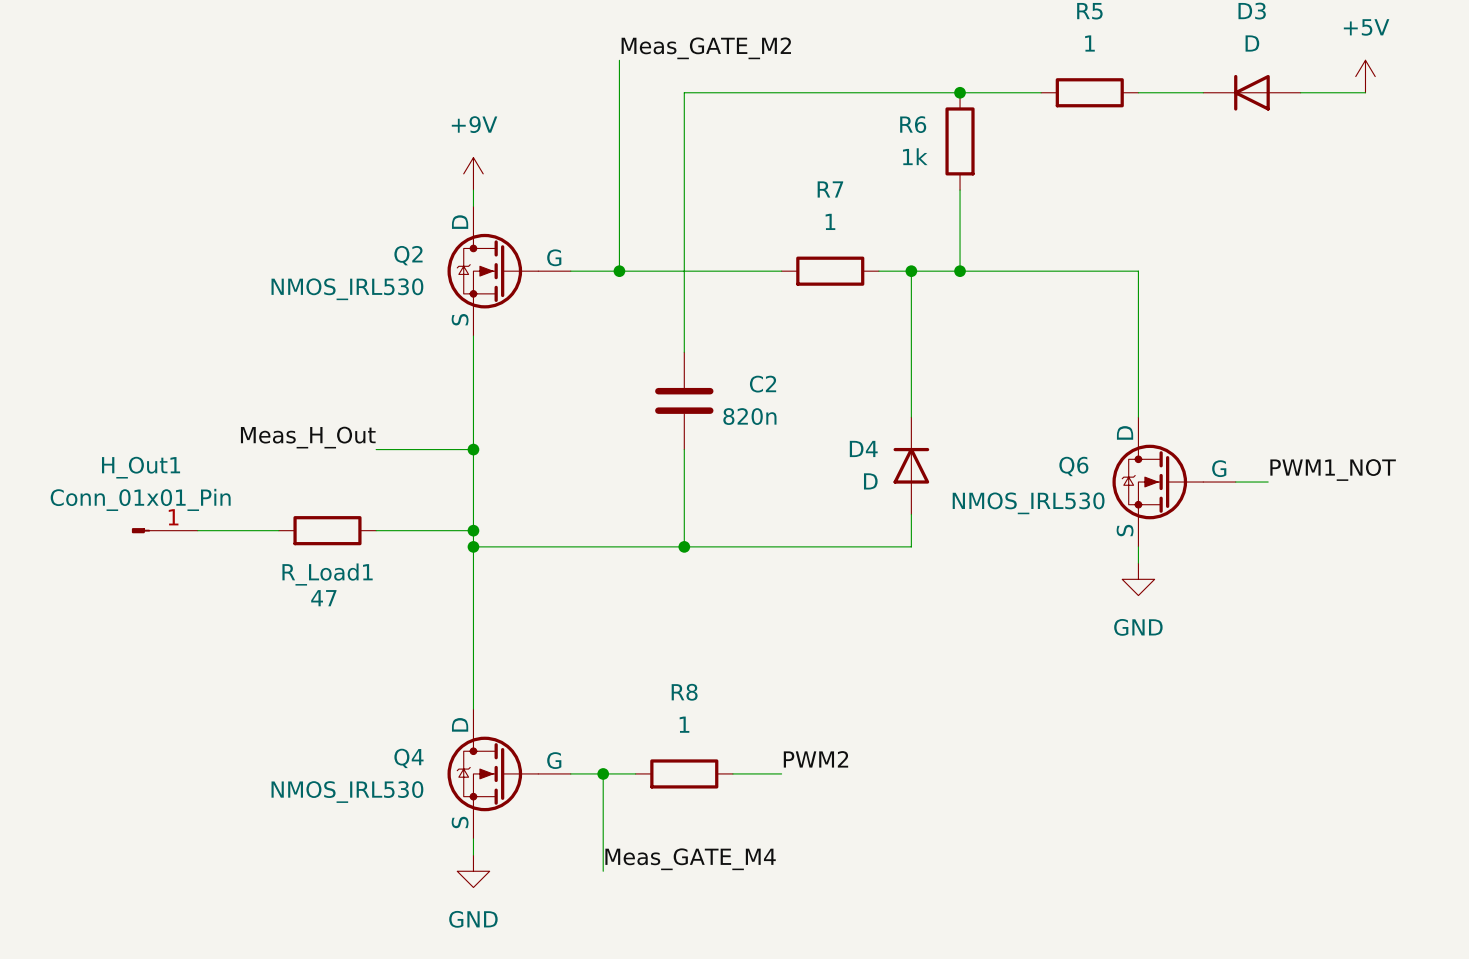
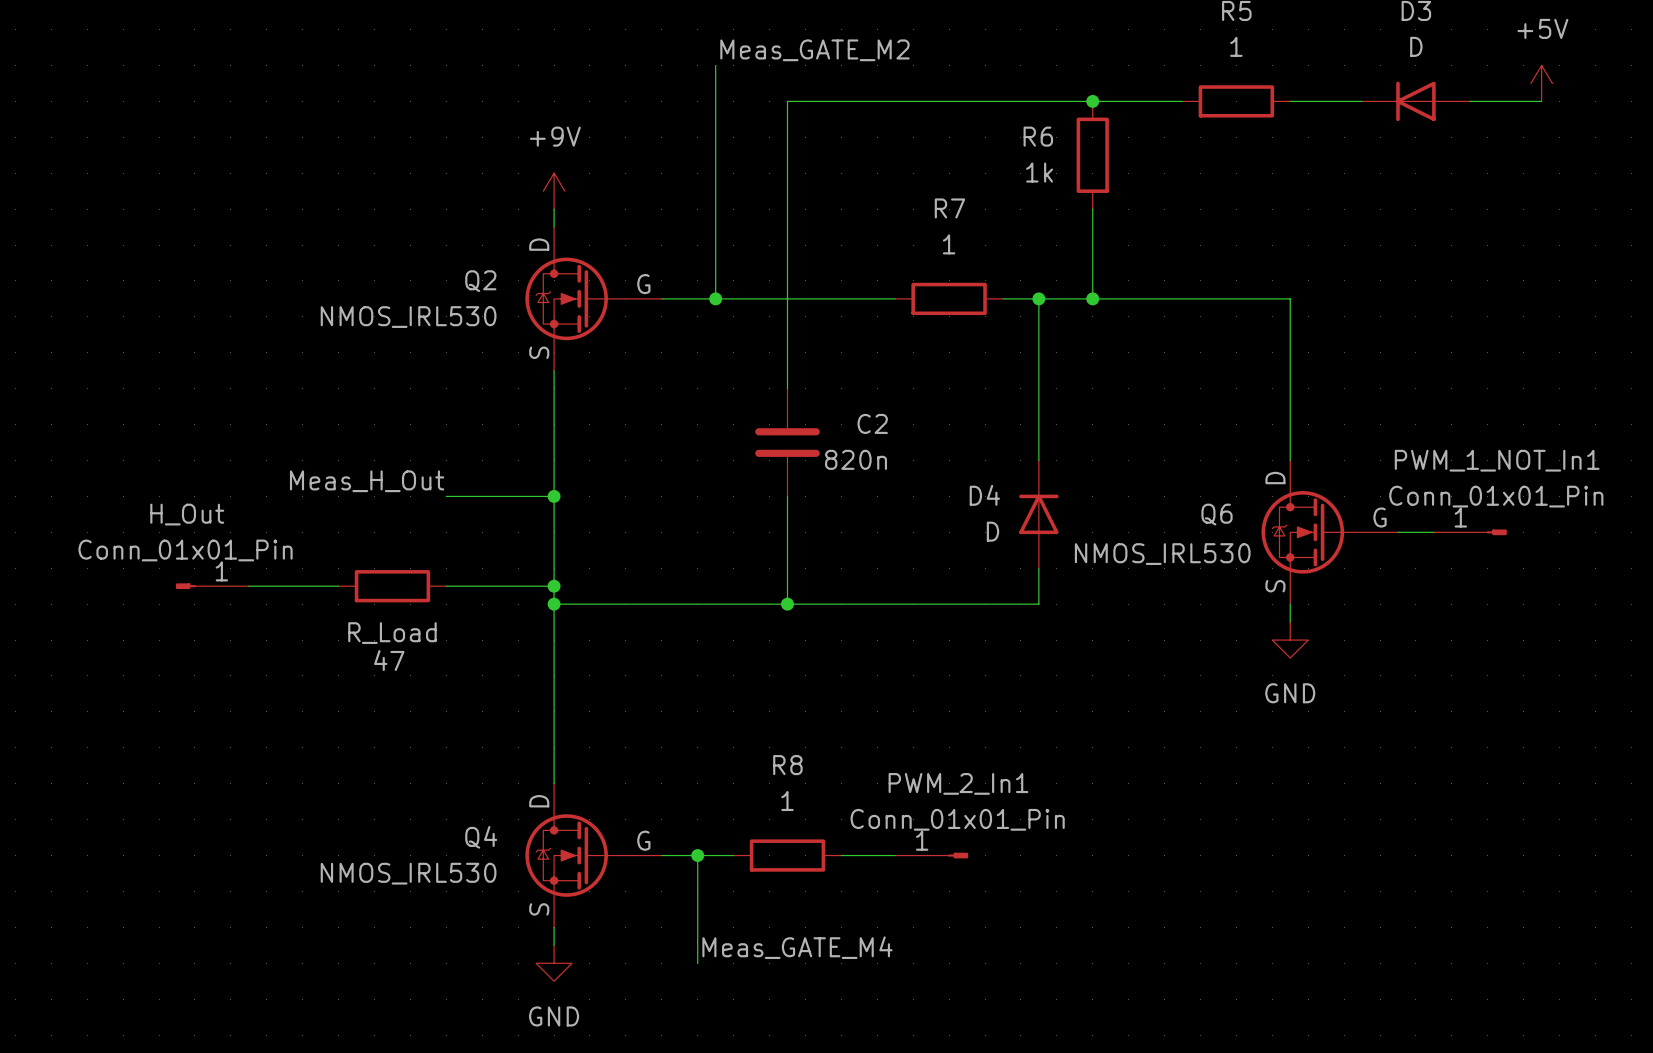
H_Out1 name: H_Out1 (141, 467) -> H_Out (187, 514)
label: PWM1_NOT (1333, 470) -> none
PWM_1_NOT_In1: none -> Conn_01x01_Pin (1470, 532)
R_Load1 name: R_Load1 (327, 574) -> R_Load (392, 633)
label: PWM2 (815, 759) -> none
PWM_2_In1: none -> Conn_01x01_Pin (931, 855)

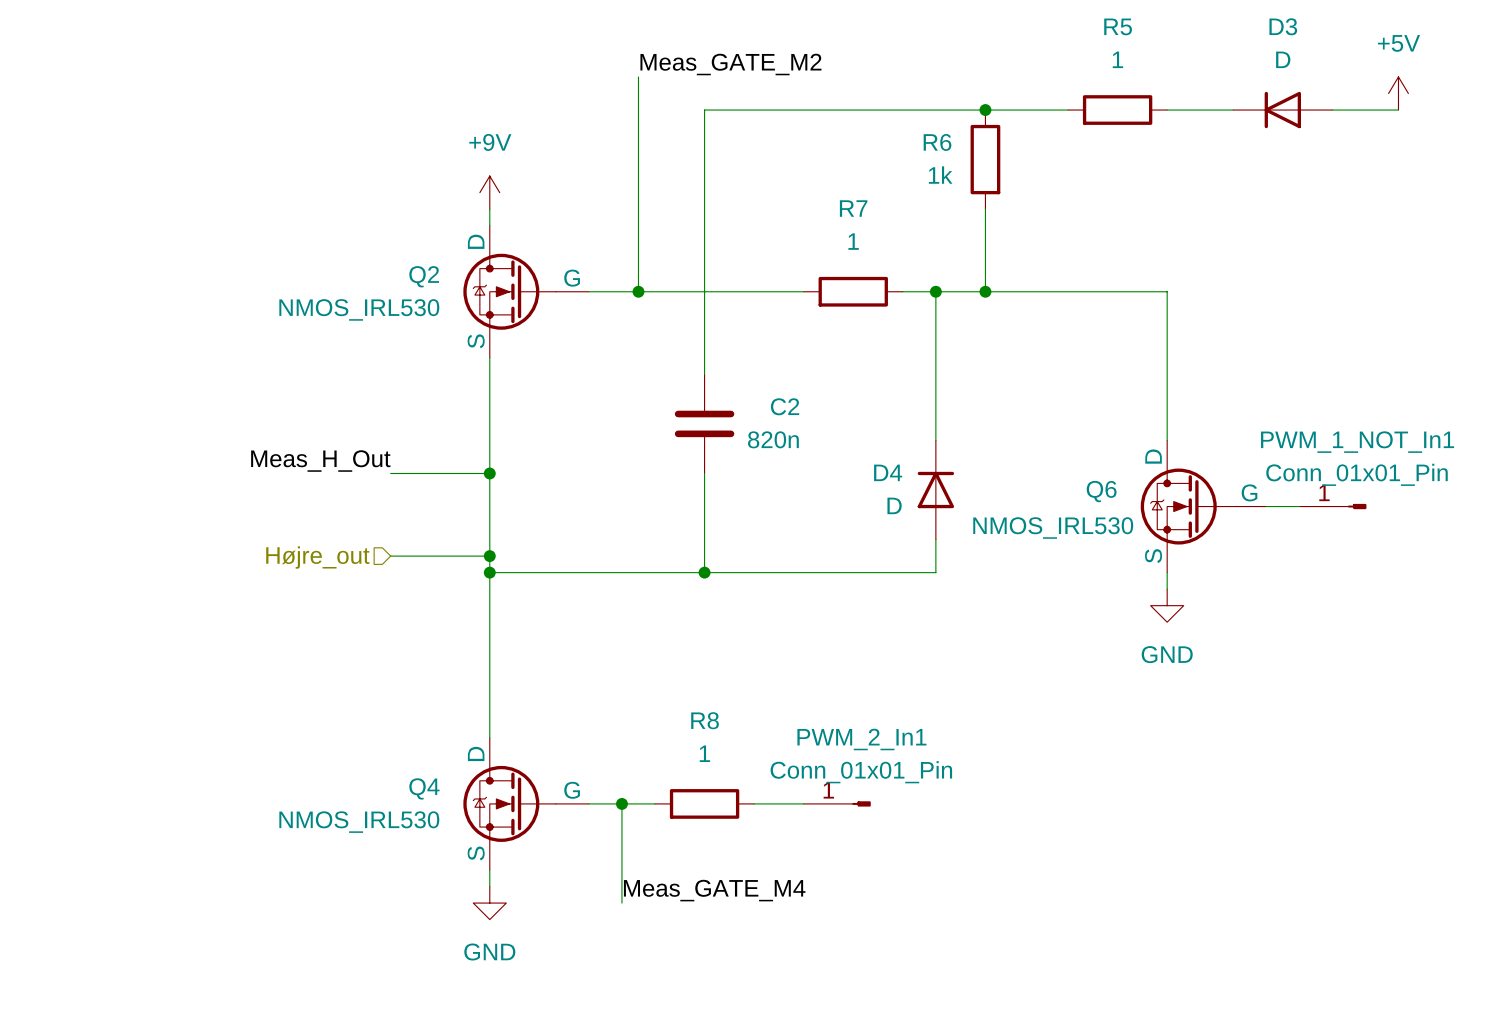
H_Out: Conn_01x01_Pin (212, 586) -> none
wire: (248, 586) (338, 586) -> none
R_Load: 47 (392, 586) -> none
hierarchical label: none -> Højre_out (317, 557)

